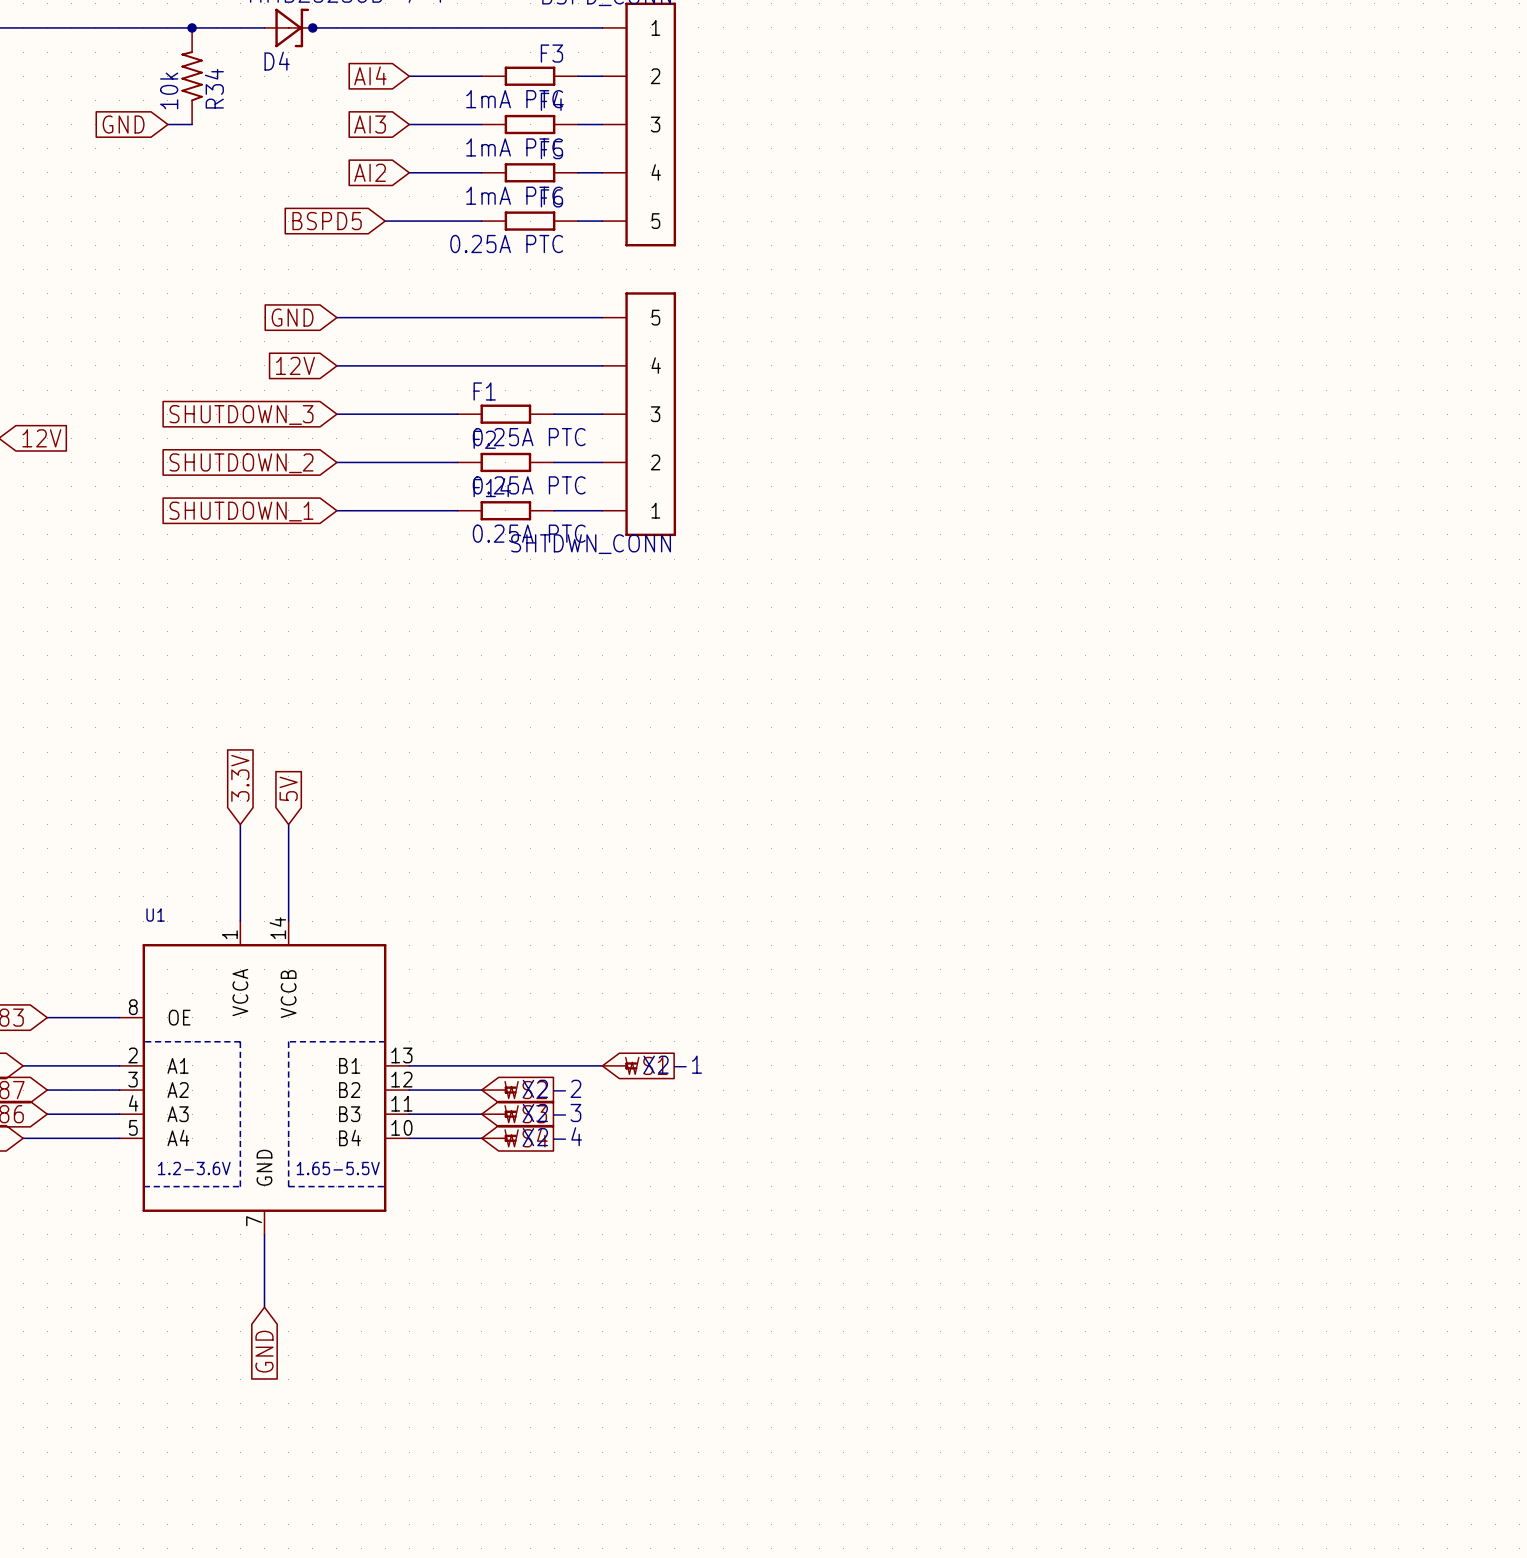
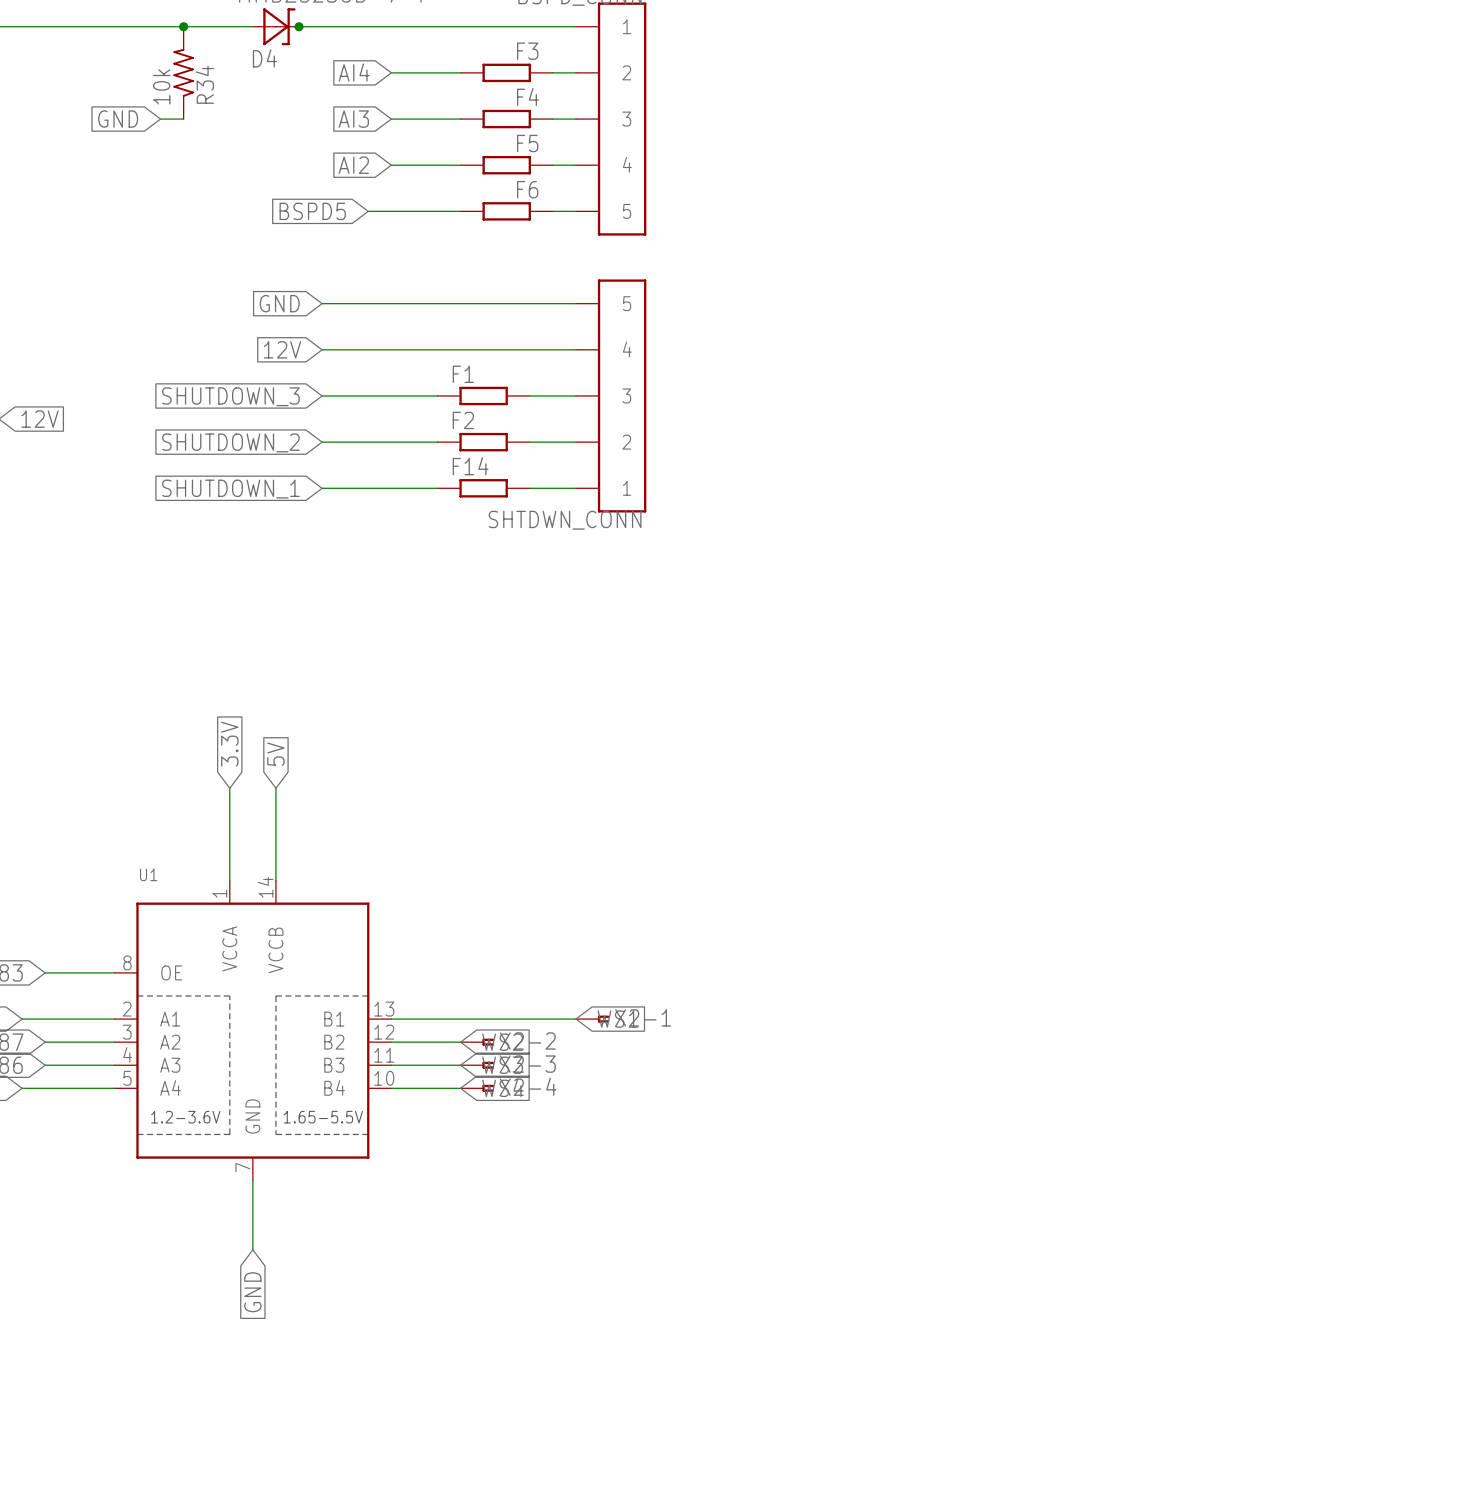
F3 value: 1mA PTC (514, 99) -> none
F4 value: 1mA PTC (514, 147) -> none
F5 value: 1mA PTC (514, 195) -> none
F6 value: 0.25A PTC (506, 244) -> none
F1 value: 0.25A PTC (529, 437) -> none
F2 value: 0.25A PTC (529, 485) -> none
F14 value: 0.25A PTC (529, 533) -> none

